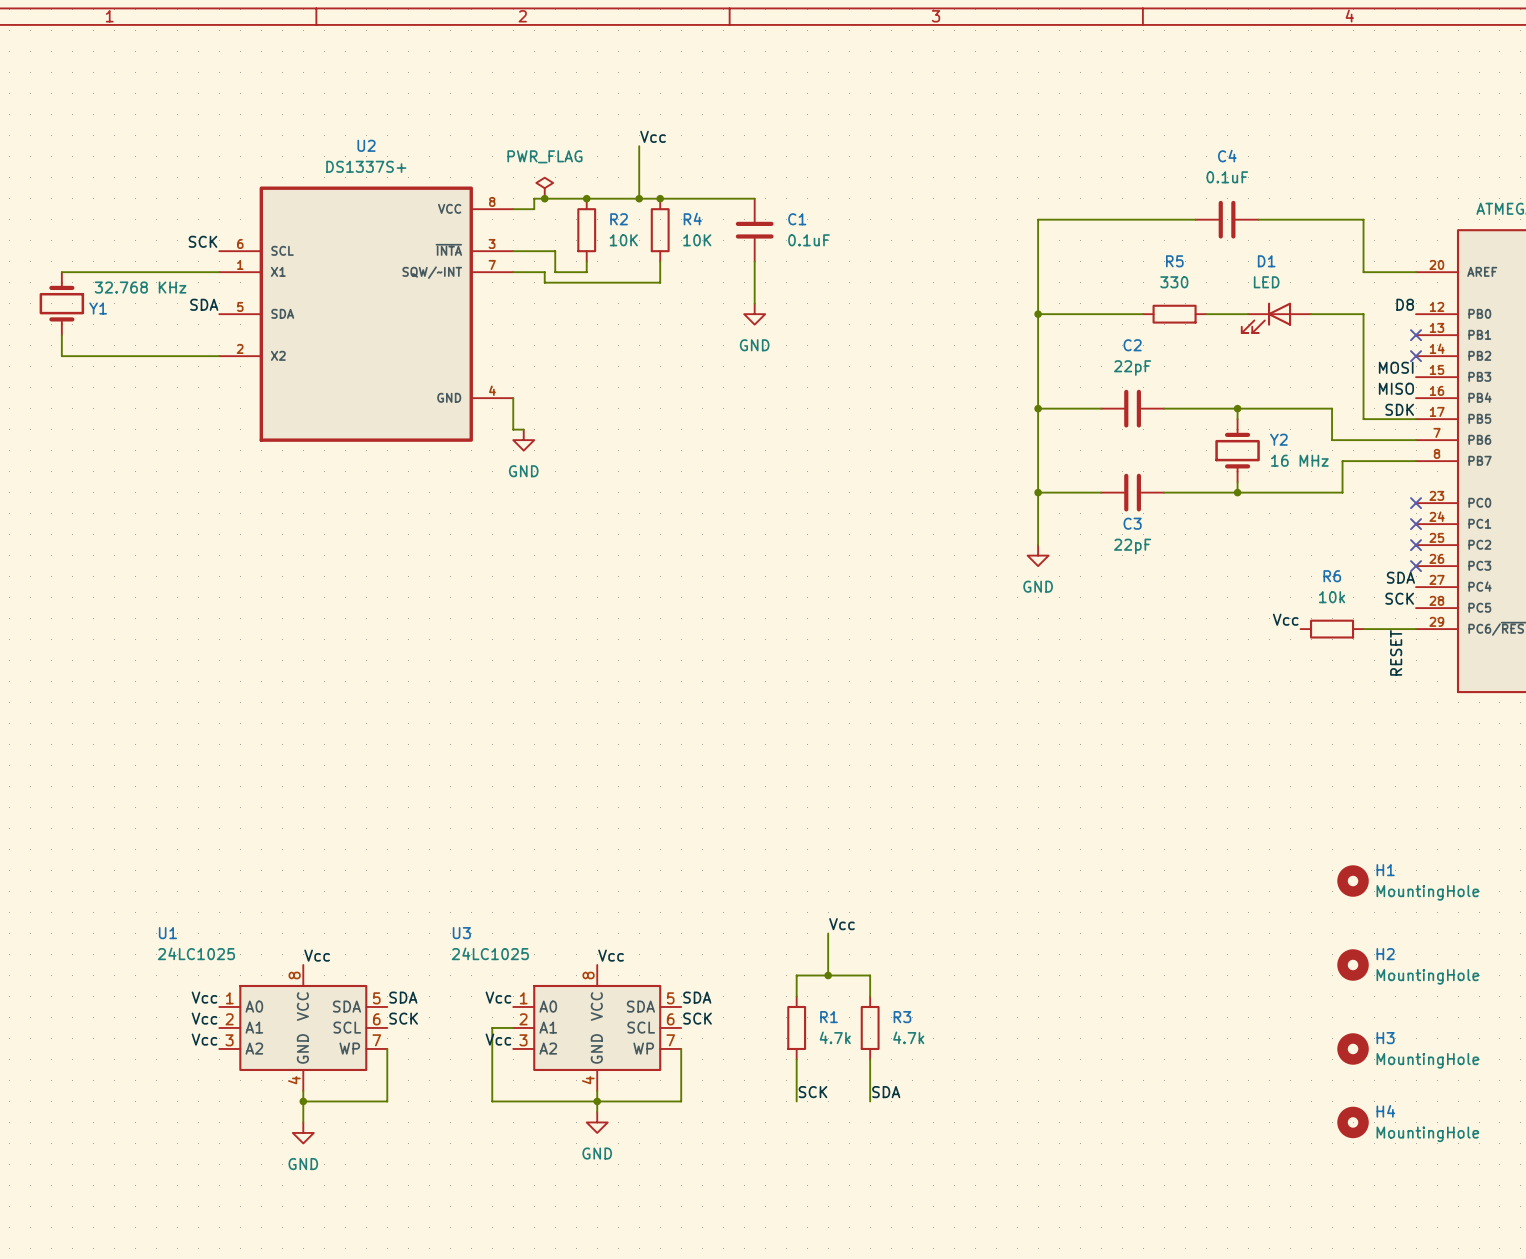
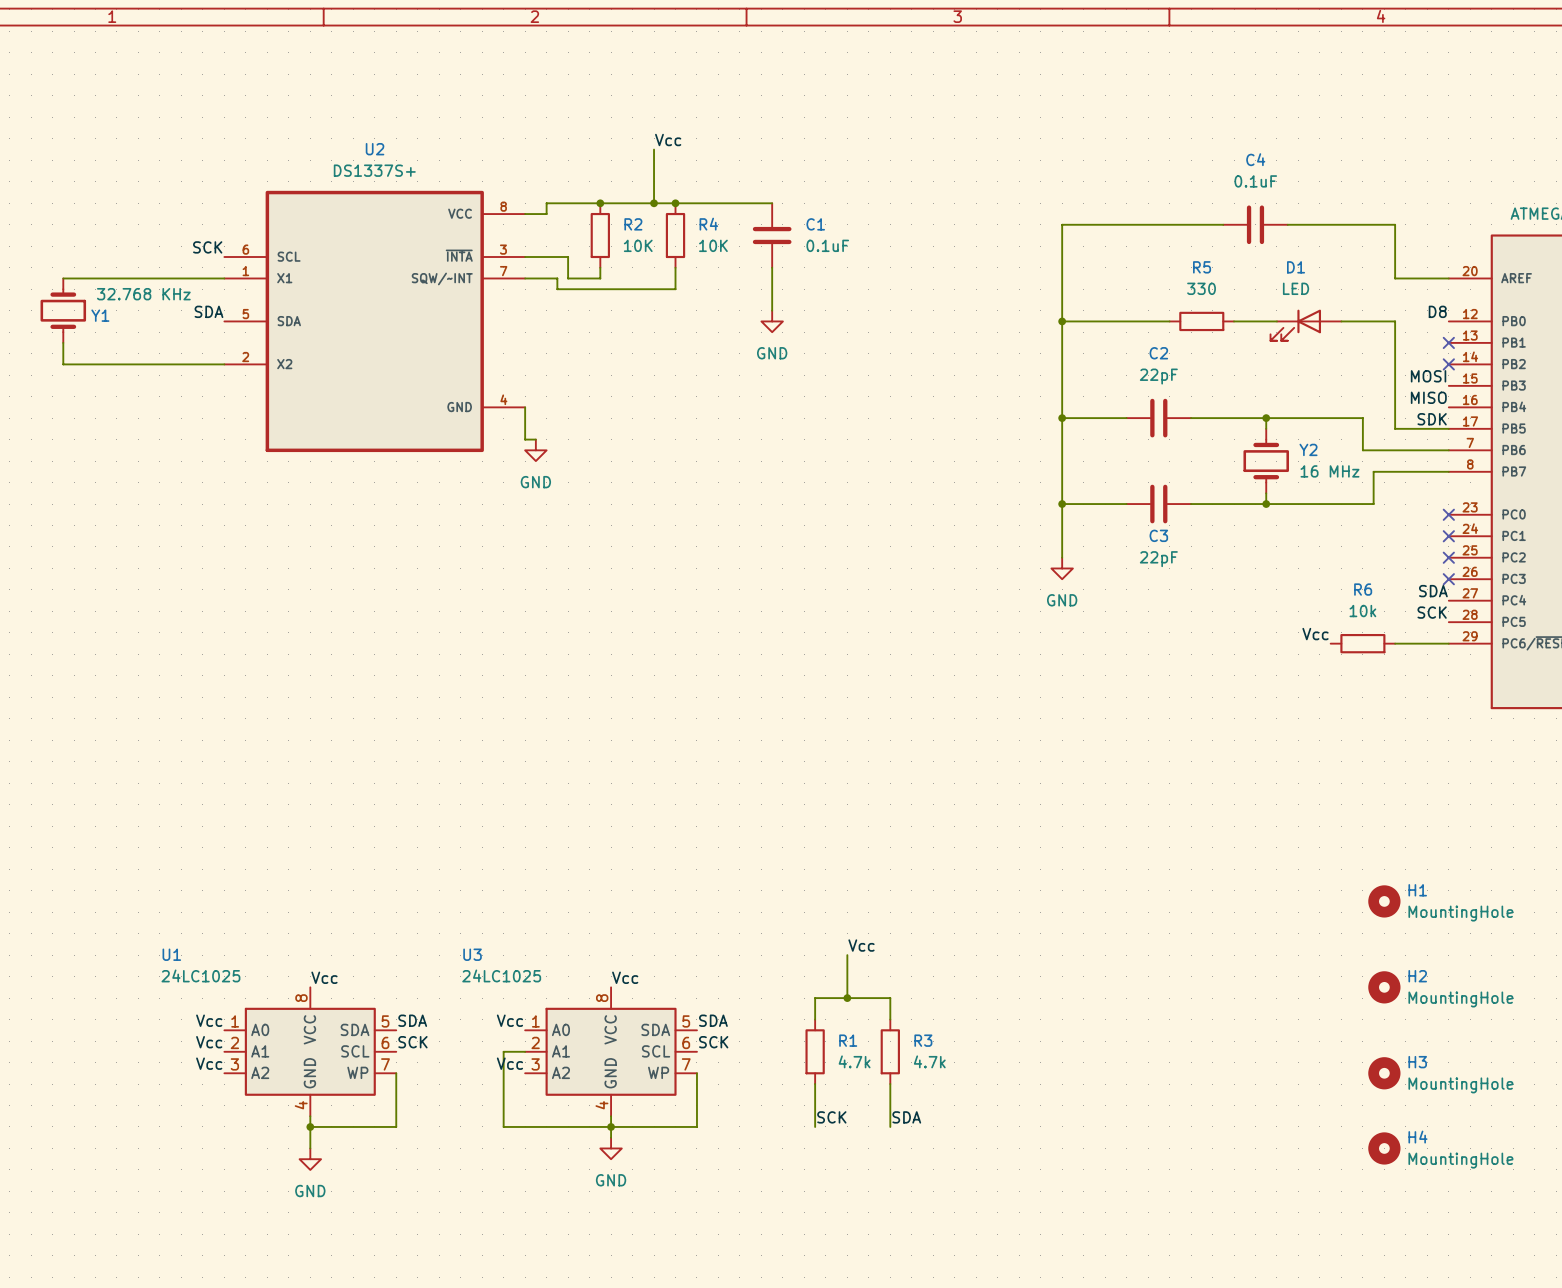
power symbol: PWR_FLAG (544, 188) -> none
junction: (544, 198) -> none
label: RESET (1396, 652) -> none

